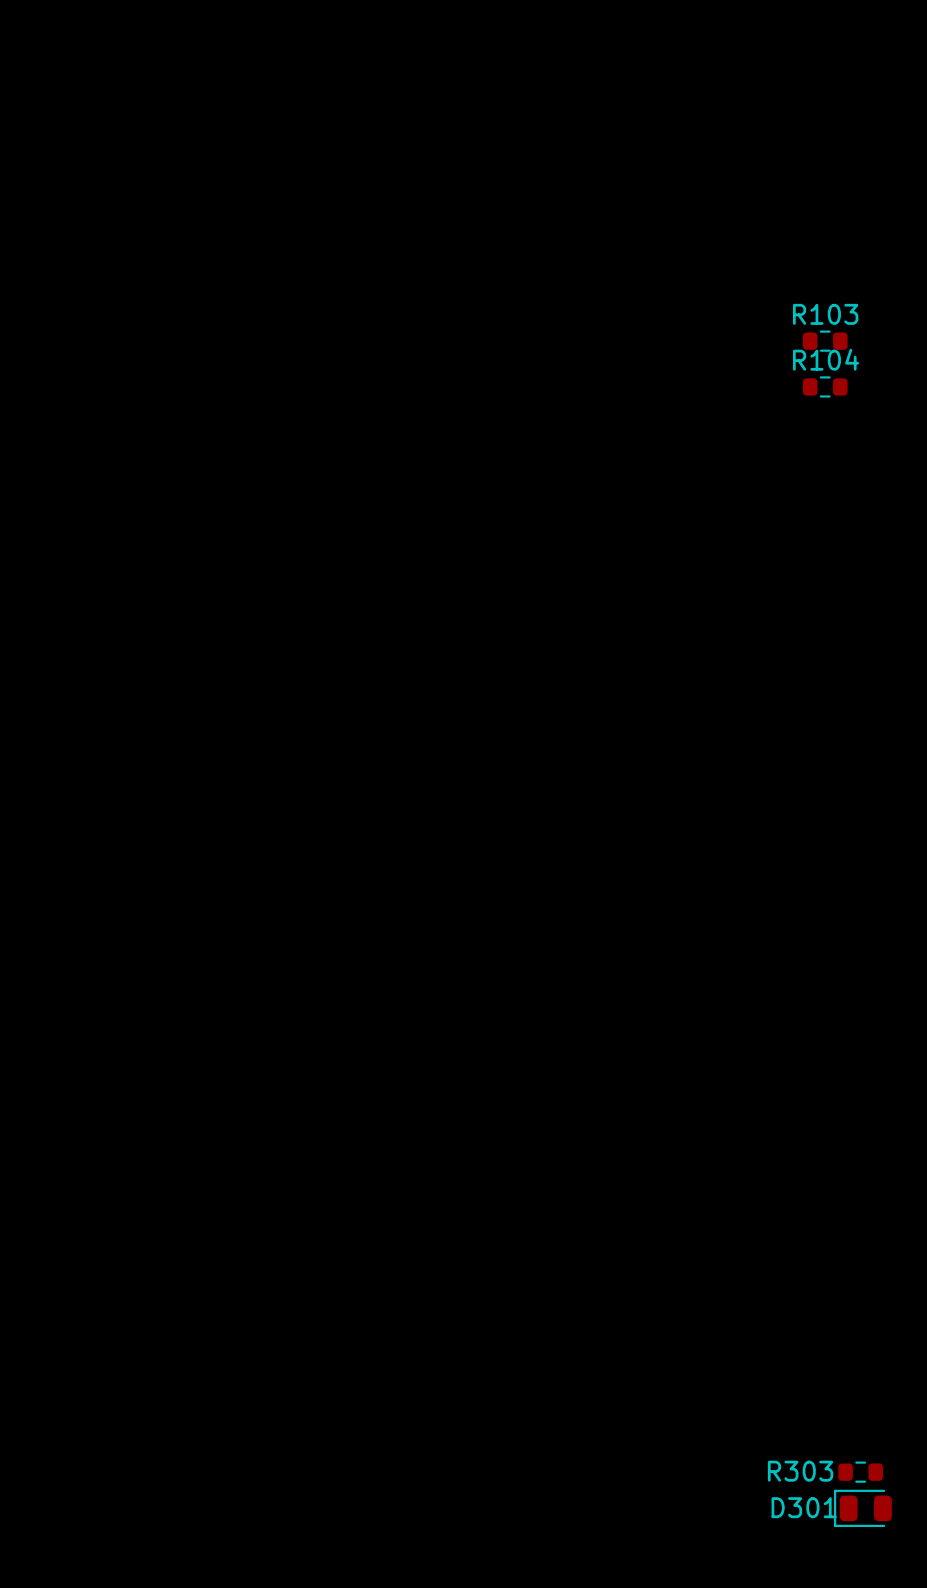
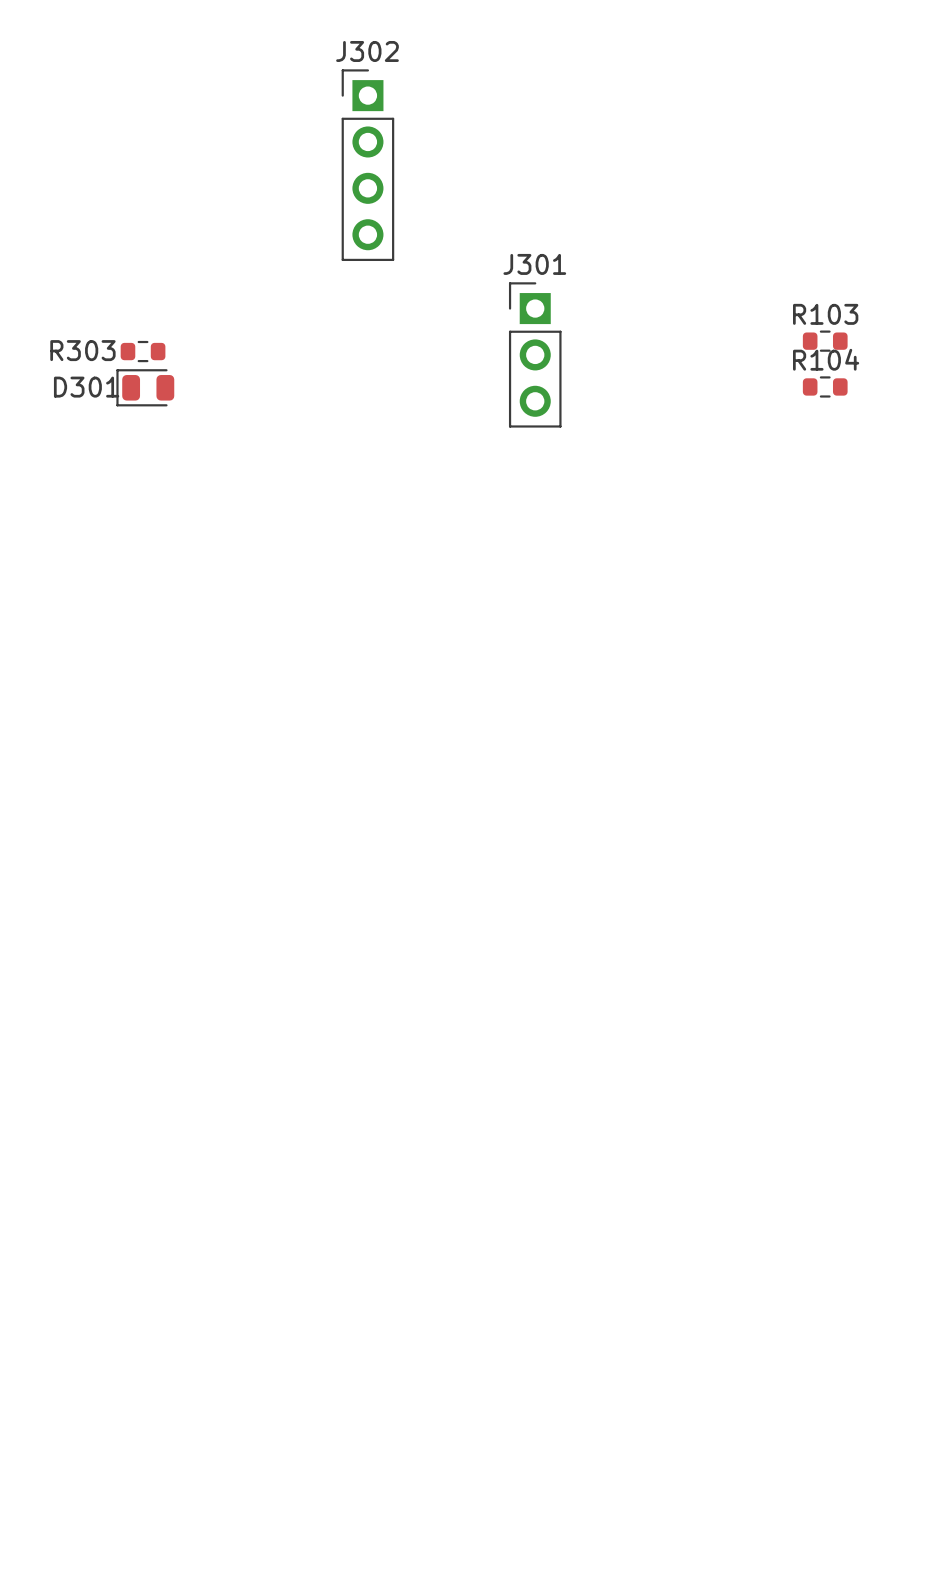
J302: none -> (367, 165)
J301: none -> (535, 354)
R303 position: (860, 1472) -> (143, 351)
D301 position: (862, 1508) -> (145, 387)

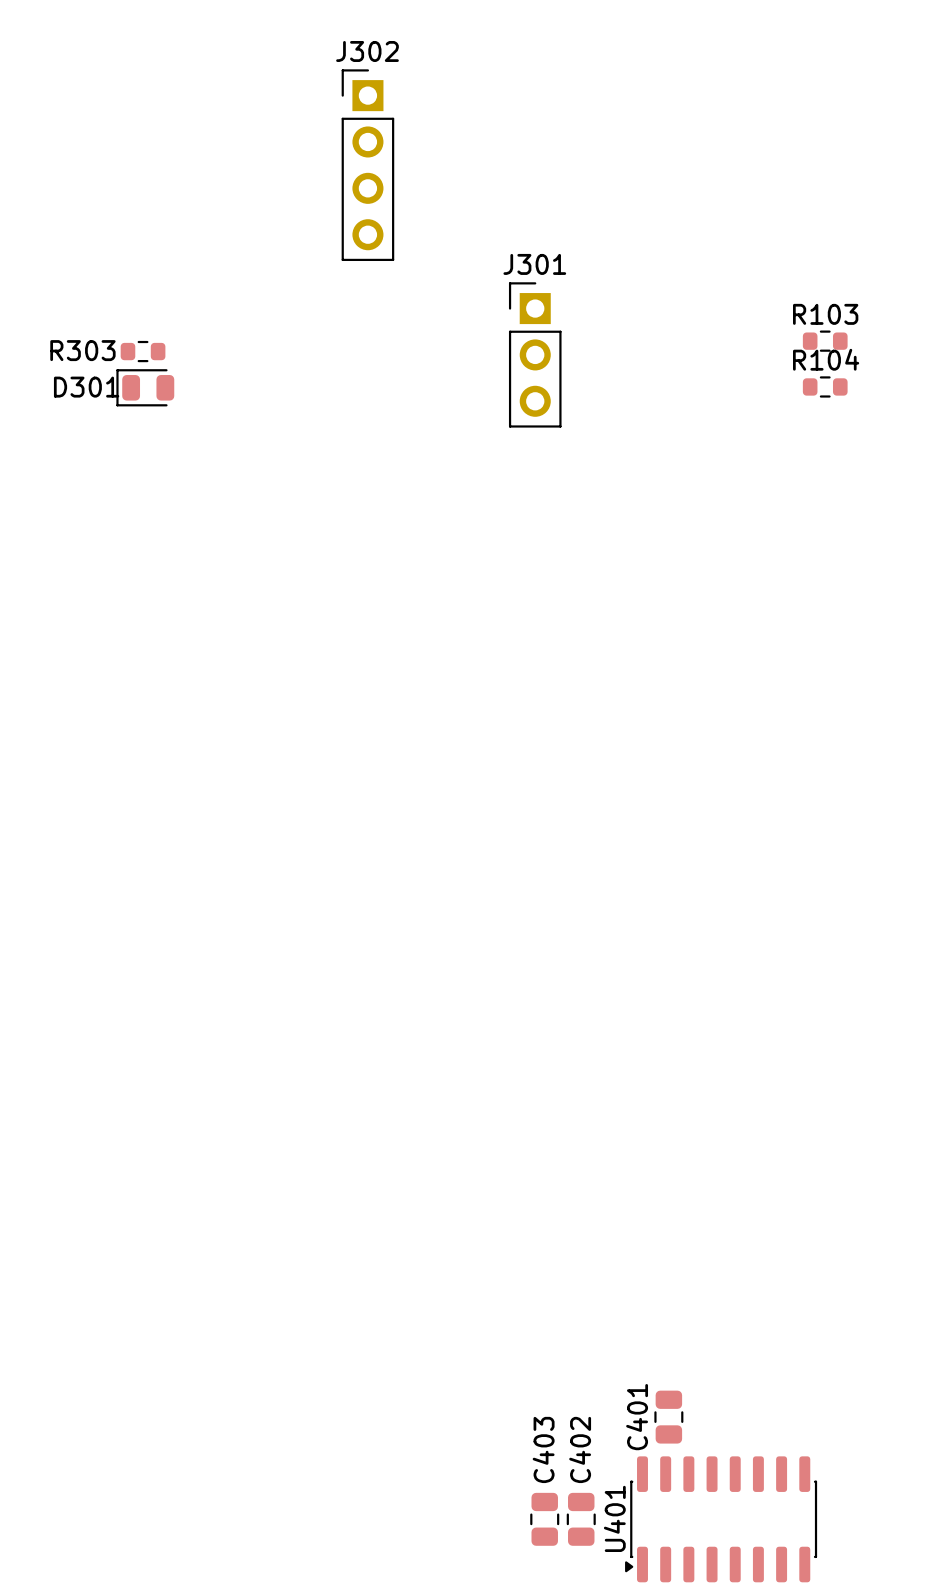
C401: none -> (668, 1417)
C403: none -> (544, 1519)
C402: none -> (581, 1519)
U401: none -> (721, 1519)

